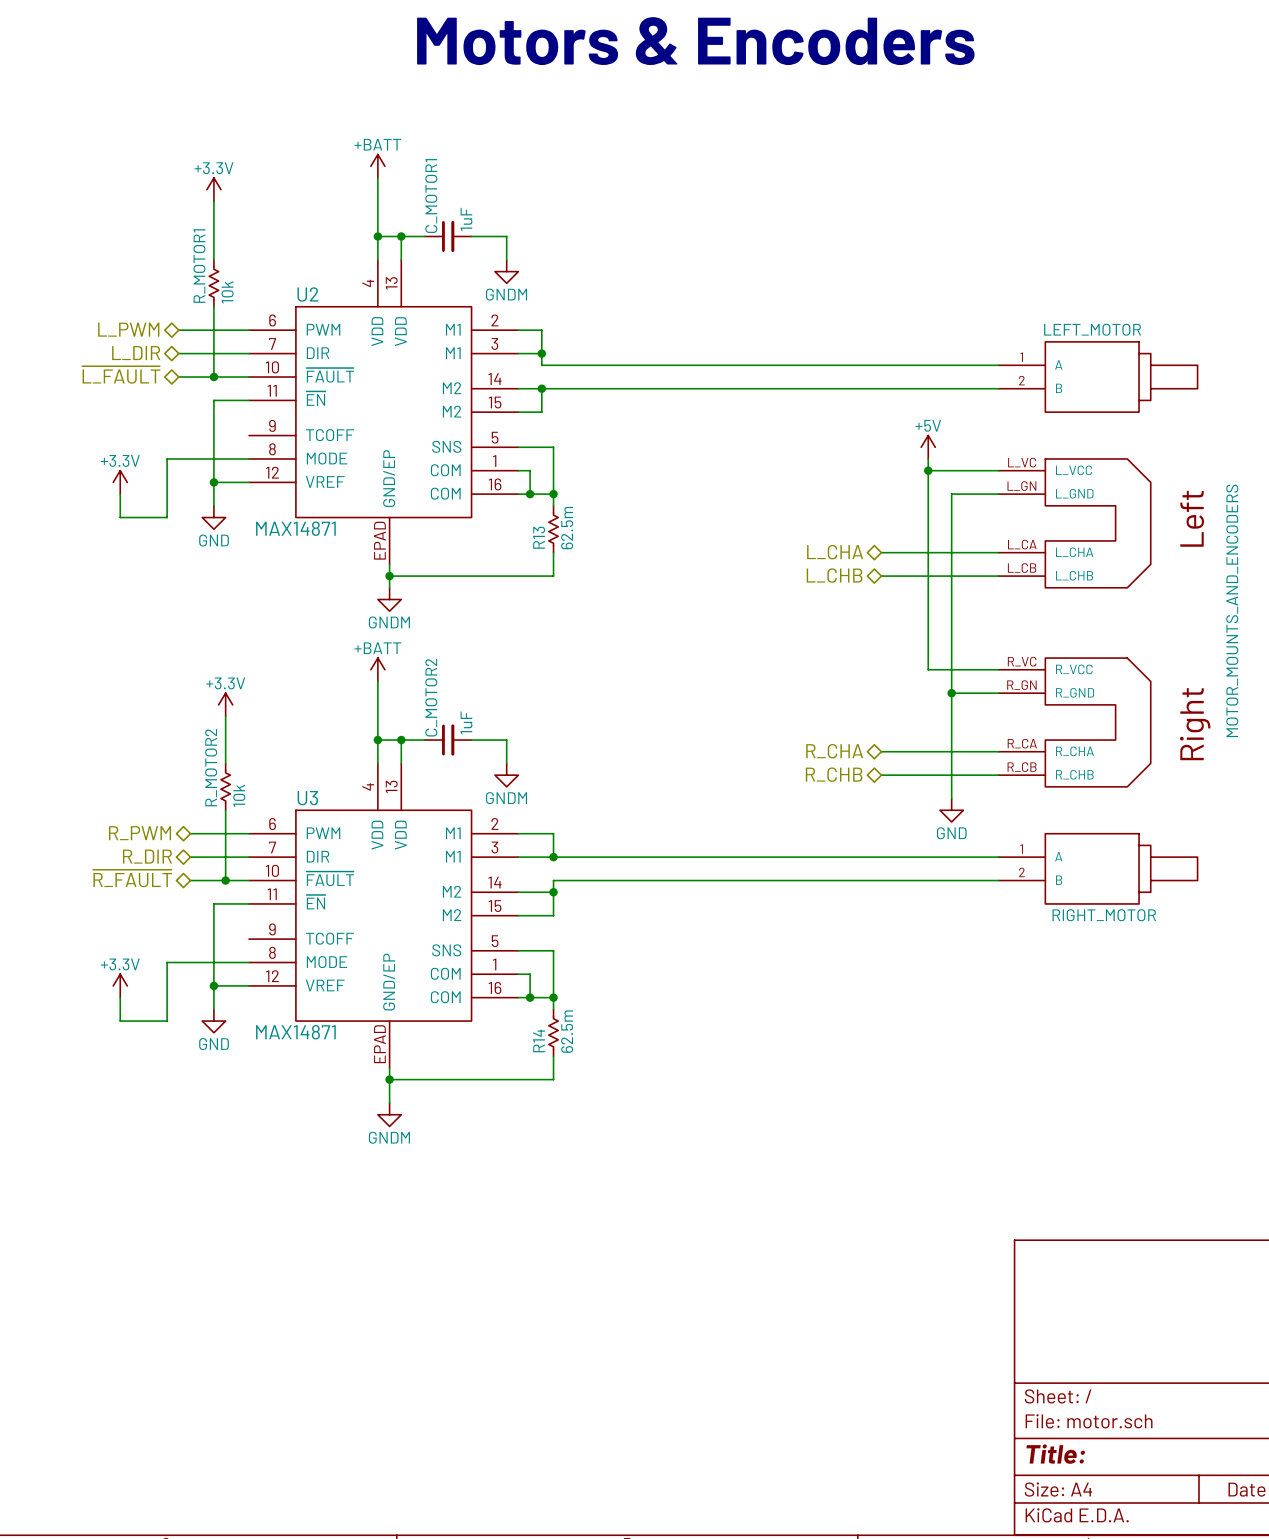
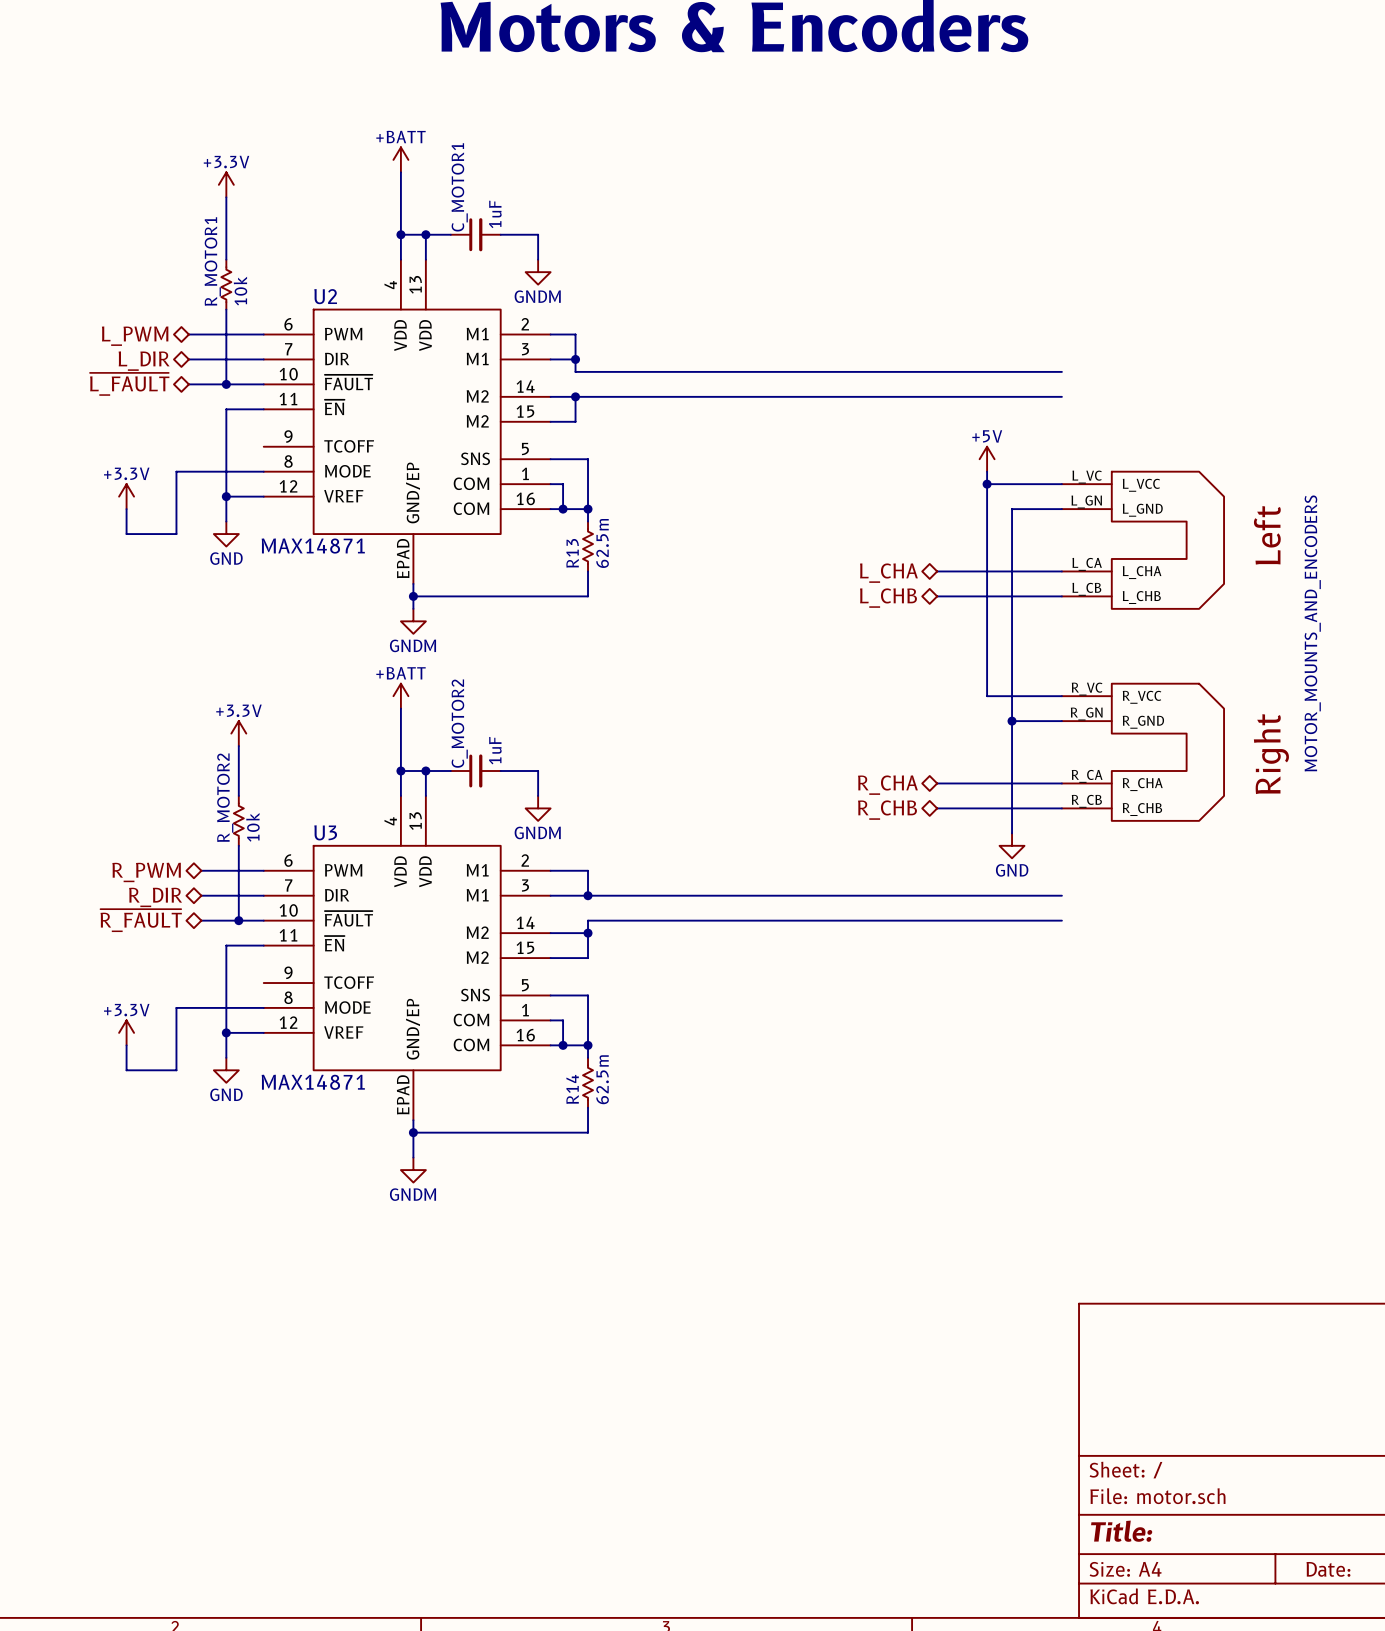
part: LEFT_MOTOR (1098, 377) -> none
part: RIGHT_MOTOR (1098, 868) -> none

